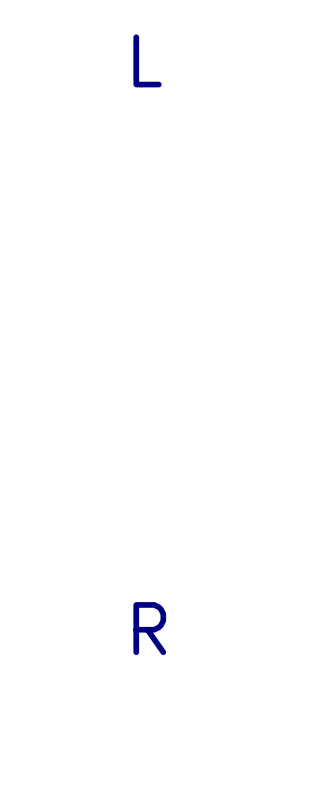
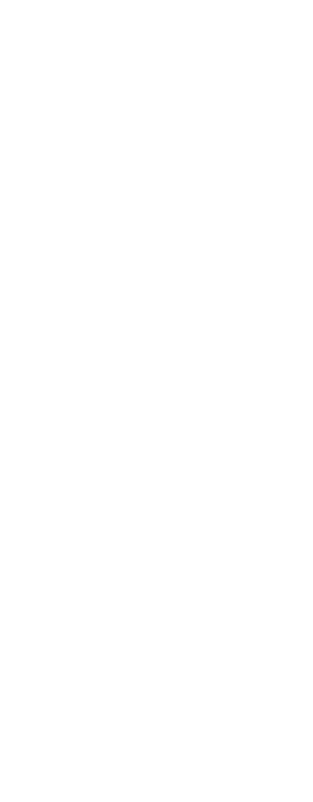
text: L (147, 60) -> none
text: R (149, 628) -> none

